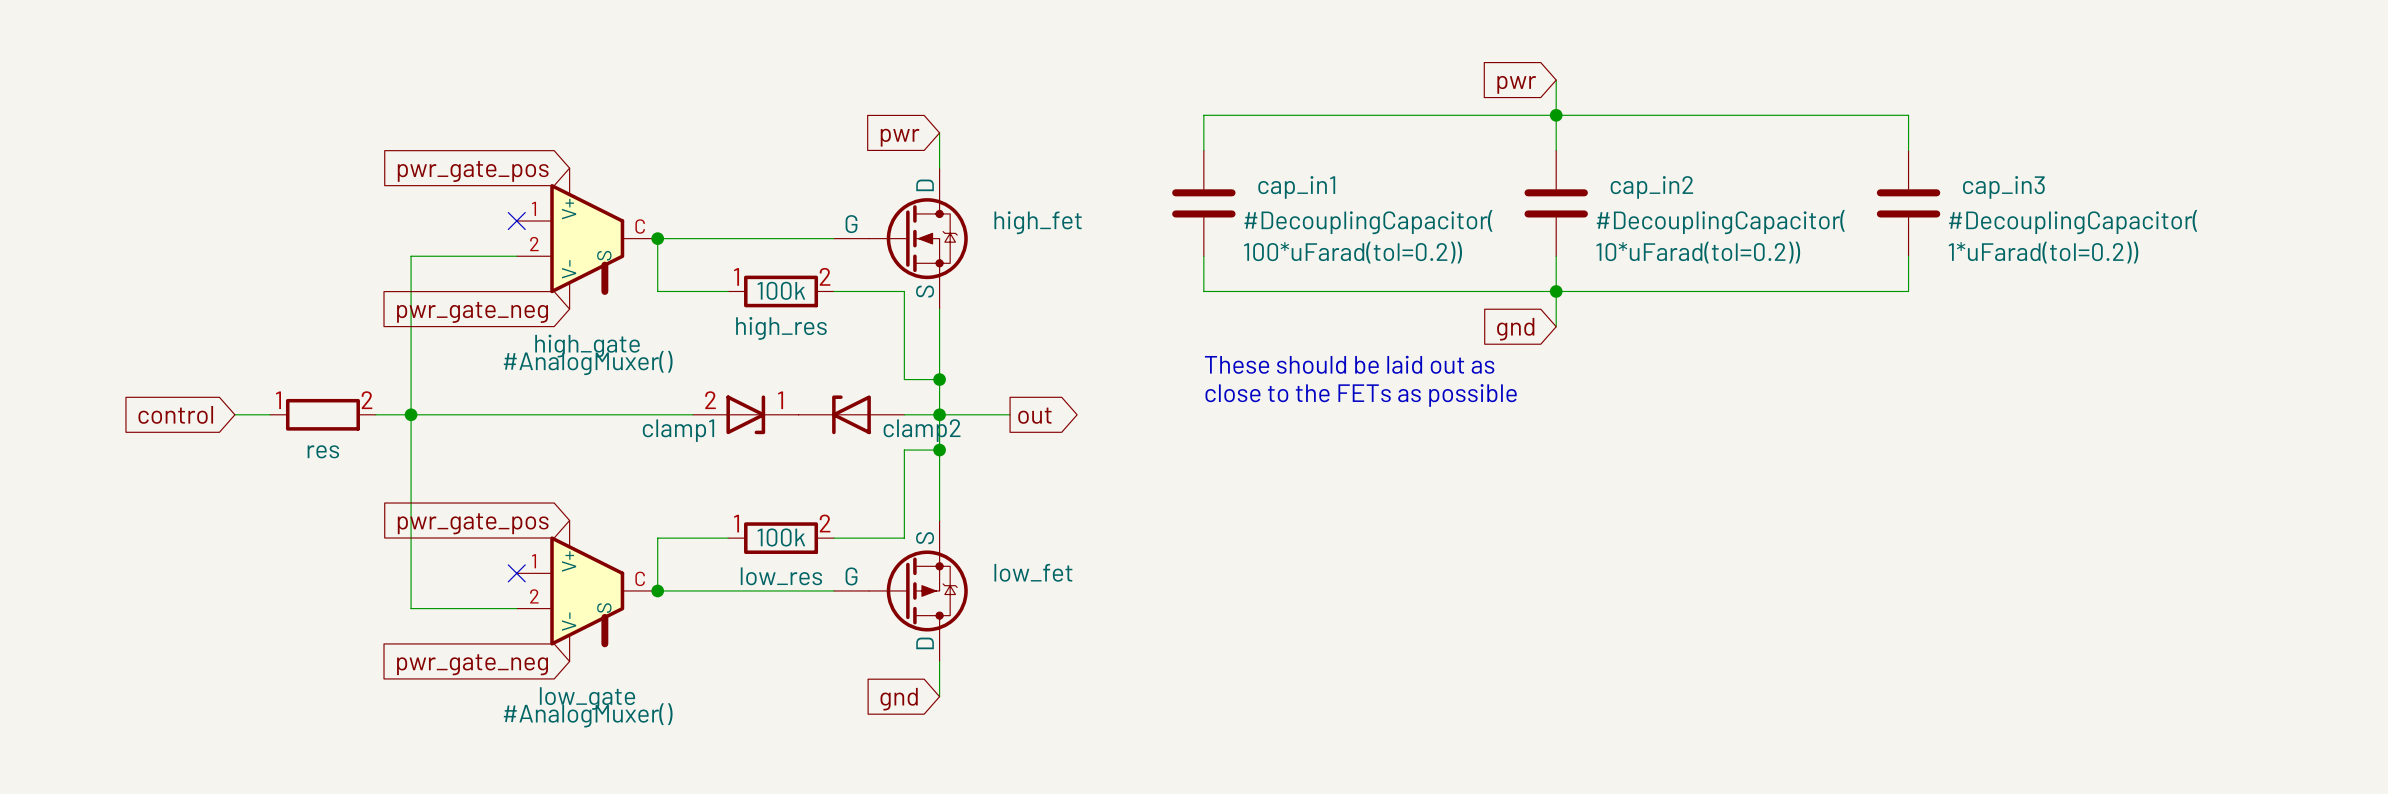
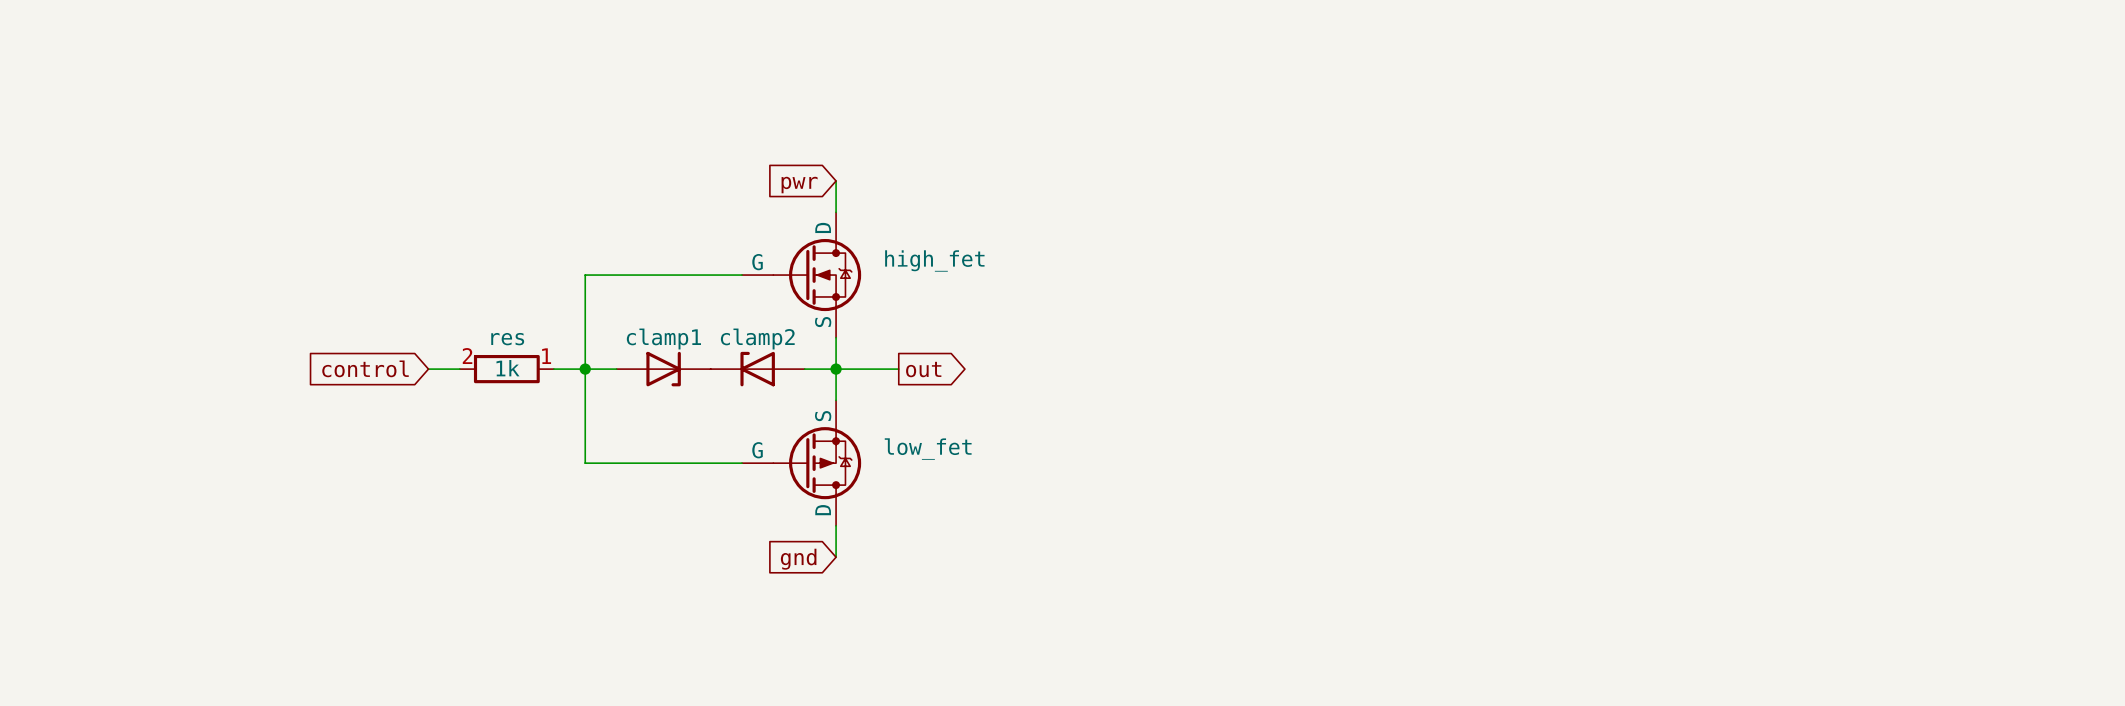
wire: (1556, 80) (1556, 150) -> none
global label: pwr (1516, 84) -> none
junction: (1556, 115) -> none
wire: (939, 132) (939, 168) -> (836, 180) (836, 212)
global label position: pwr (900, 137) -> pwr (799, 185)
wire: (1203, 150) (1203, 115) (1908, 115) (1908, 150) -> none
global label: pwr_gate_pos (473, 171) -> none
cap_in1: #DecouplingCapacitor( (1203, 203) -> none
cap_in2: #DecouplingCapacitor( (1556, 203) -> none
cap_in3: #DecouplingCapacitor( (1908, 203) -> none
no-connect mark: (516, 221) -> none
high_gate: #AnalogMuxer() (587, 238) -> none
junction: (657, 238) -> none
wire: (833, 238) (657, 238) (657, 291) (728, 291) -> none
high_fet position: (900, 238) -> (801, 275)
wire: (516, 256) (411, 256) (411, 608) (516, 608) -> none
wire: (1203, 256) (1203, 291) (1908, 291) (1908, 256) -> none
wire: (1556, 256) (1556, 326) -> none
high_res: 100k (781, 291) -> none
wire: (833, 291) (904, 291) (904, 379) (939, 379) (939, 309) -> none
junction: (1556, 291) -> none
wire: none -> (742, 275) (585, 275) (585, 463) (742, 463)
global label: pwr_gate_neg (472, 312) -> none
global label: gnd (1515, 329) -> none
text: These should be laid out as (1349, 364) -> none
junction: (939, 379) -> none
text: close to the FETs as possible (1361, 395) -> none
clamp1 pin number: 2 (710, 400) -> none
clamp1 pin number: 1 (780, 400) -> none
global label position: control (175, 414) -> control (365, 368)
wire: (234, 414) (270, 414) -> none
res: (322, 414) -> none
wire: (375, 414) (481, 414) -> none
junction: (411, 414) -> none
wire: (516, 414) (622, 414) -> none
res: none -> 1k (506, 369)
junction: none -> (585, 369)
clamp1 name position: clamp1 (678, 430) -> clamp1 (663, 339)
clamp2 name position: clamp2 (922, 430) -> clamp2 (757, 339)
junction: (939, 450) -> none
wire: (939, 520) (939, 450) (904, 450) (904, 538) (833, 538) -> none
global label: pwr_gate_pos (473, 523) -> none
wire: (728, 538) (657, 538) (657, 590) (833, 590) -> none
low_res: 100k (781, 538) -> none
no-connect mark: (516, 573) -> none
low_gate: #AnalogMuxer() (587, 590) -> none
junction: (657, 590) -> none
low_fet position: (900, 590) -> (801, 463)
wire: (939, 661) (939, 696) -> (836, 525) (836, 557)
global label: pwr_gate_neg (472, 664) -> none
global label position: gnd (899, 699) -> gnd (798, 559)

